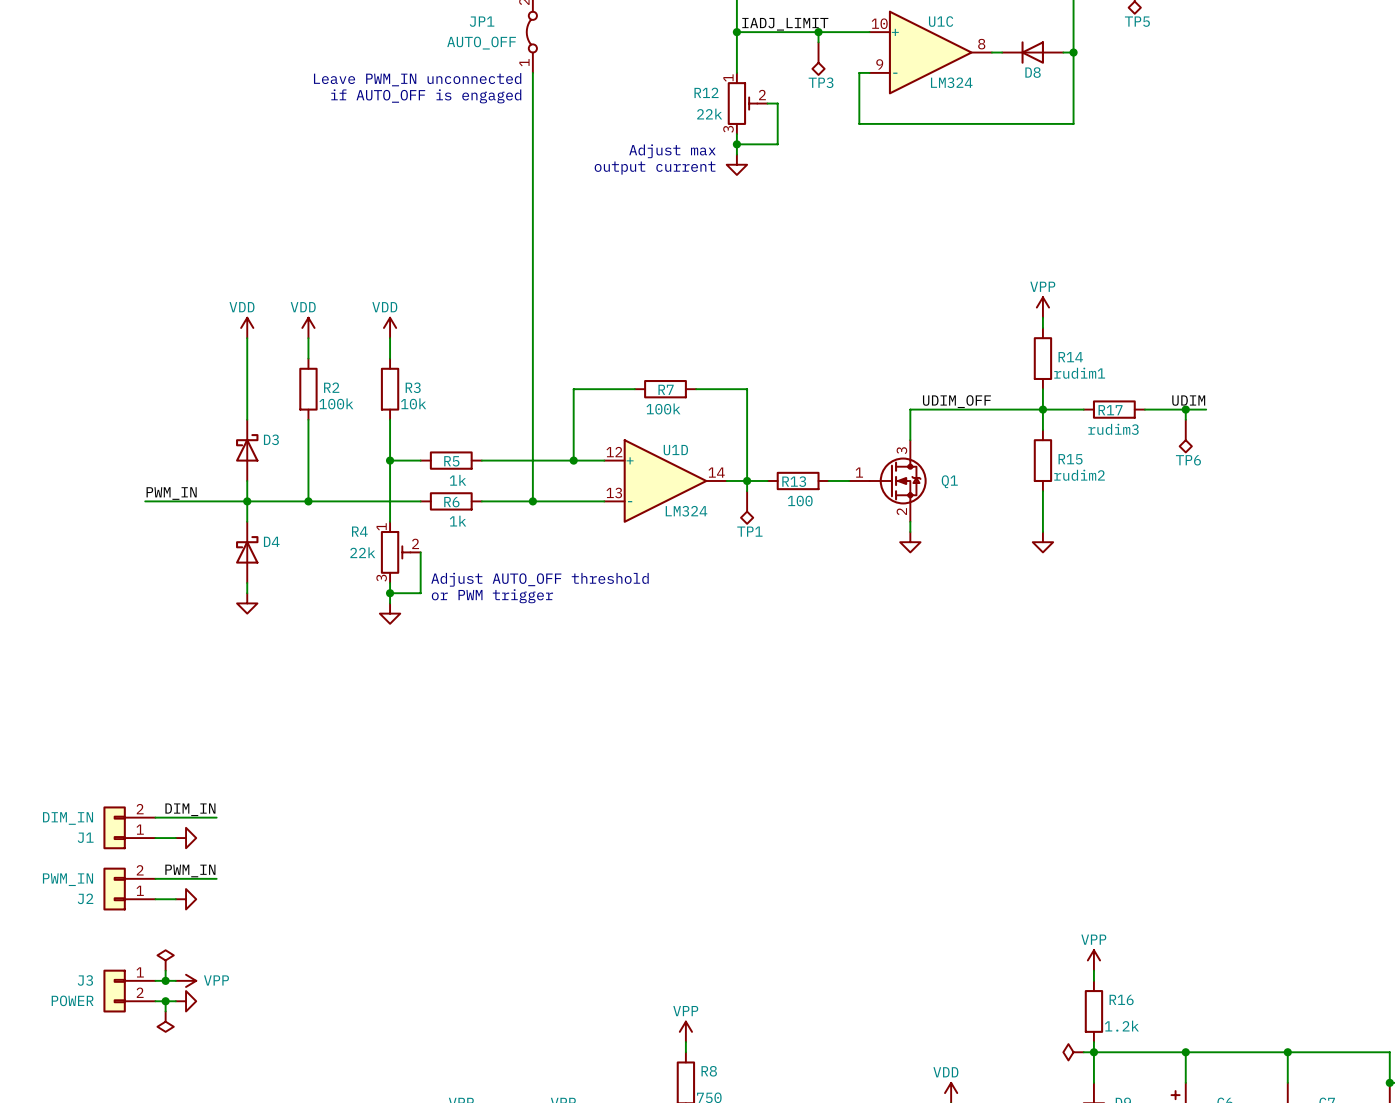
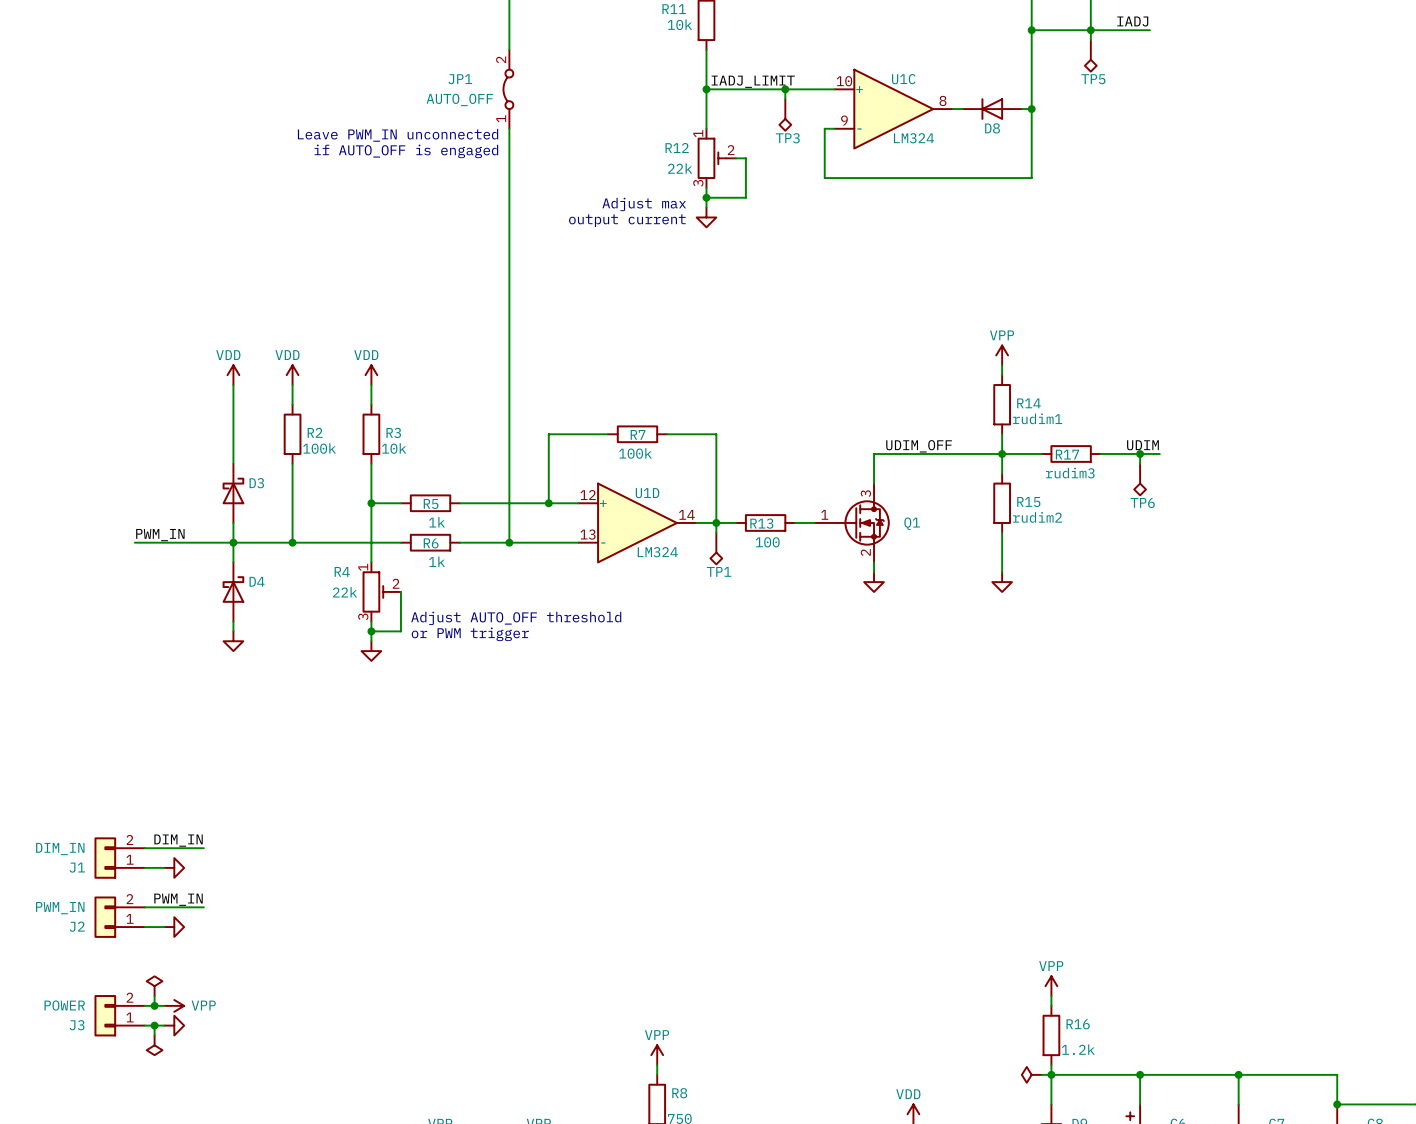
J3 flip: as is (114, 991) -> up-down (105, 1015)

